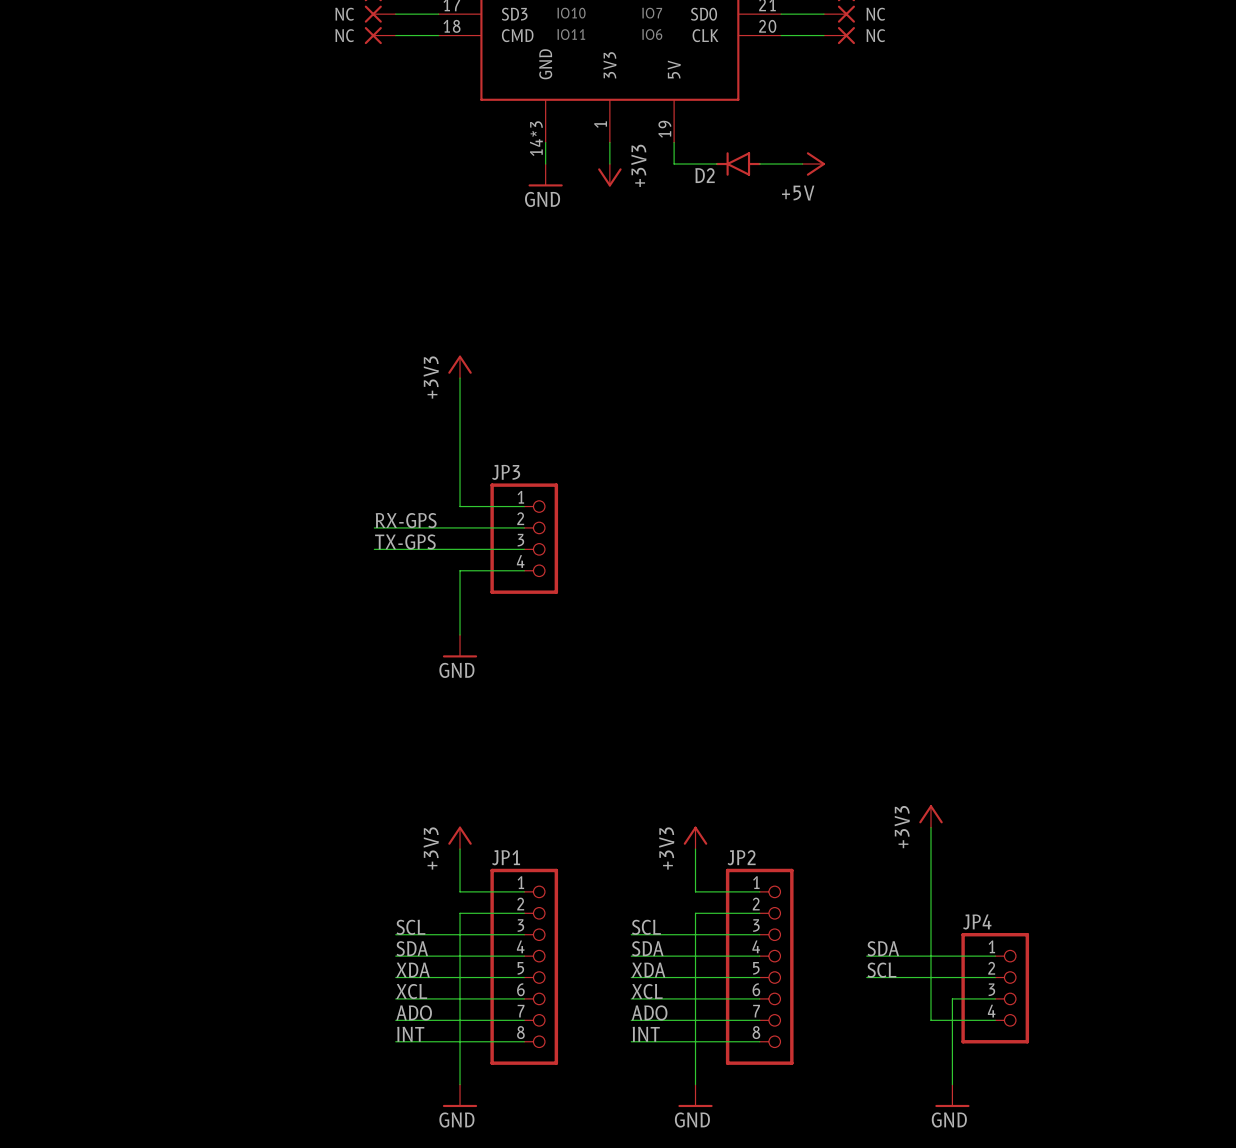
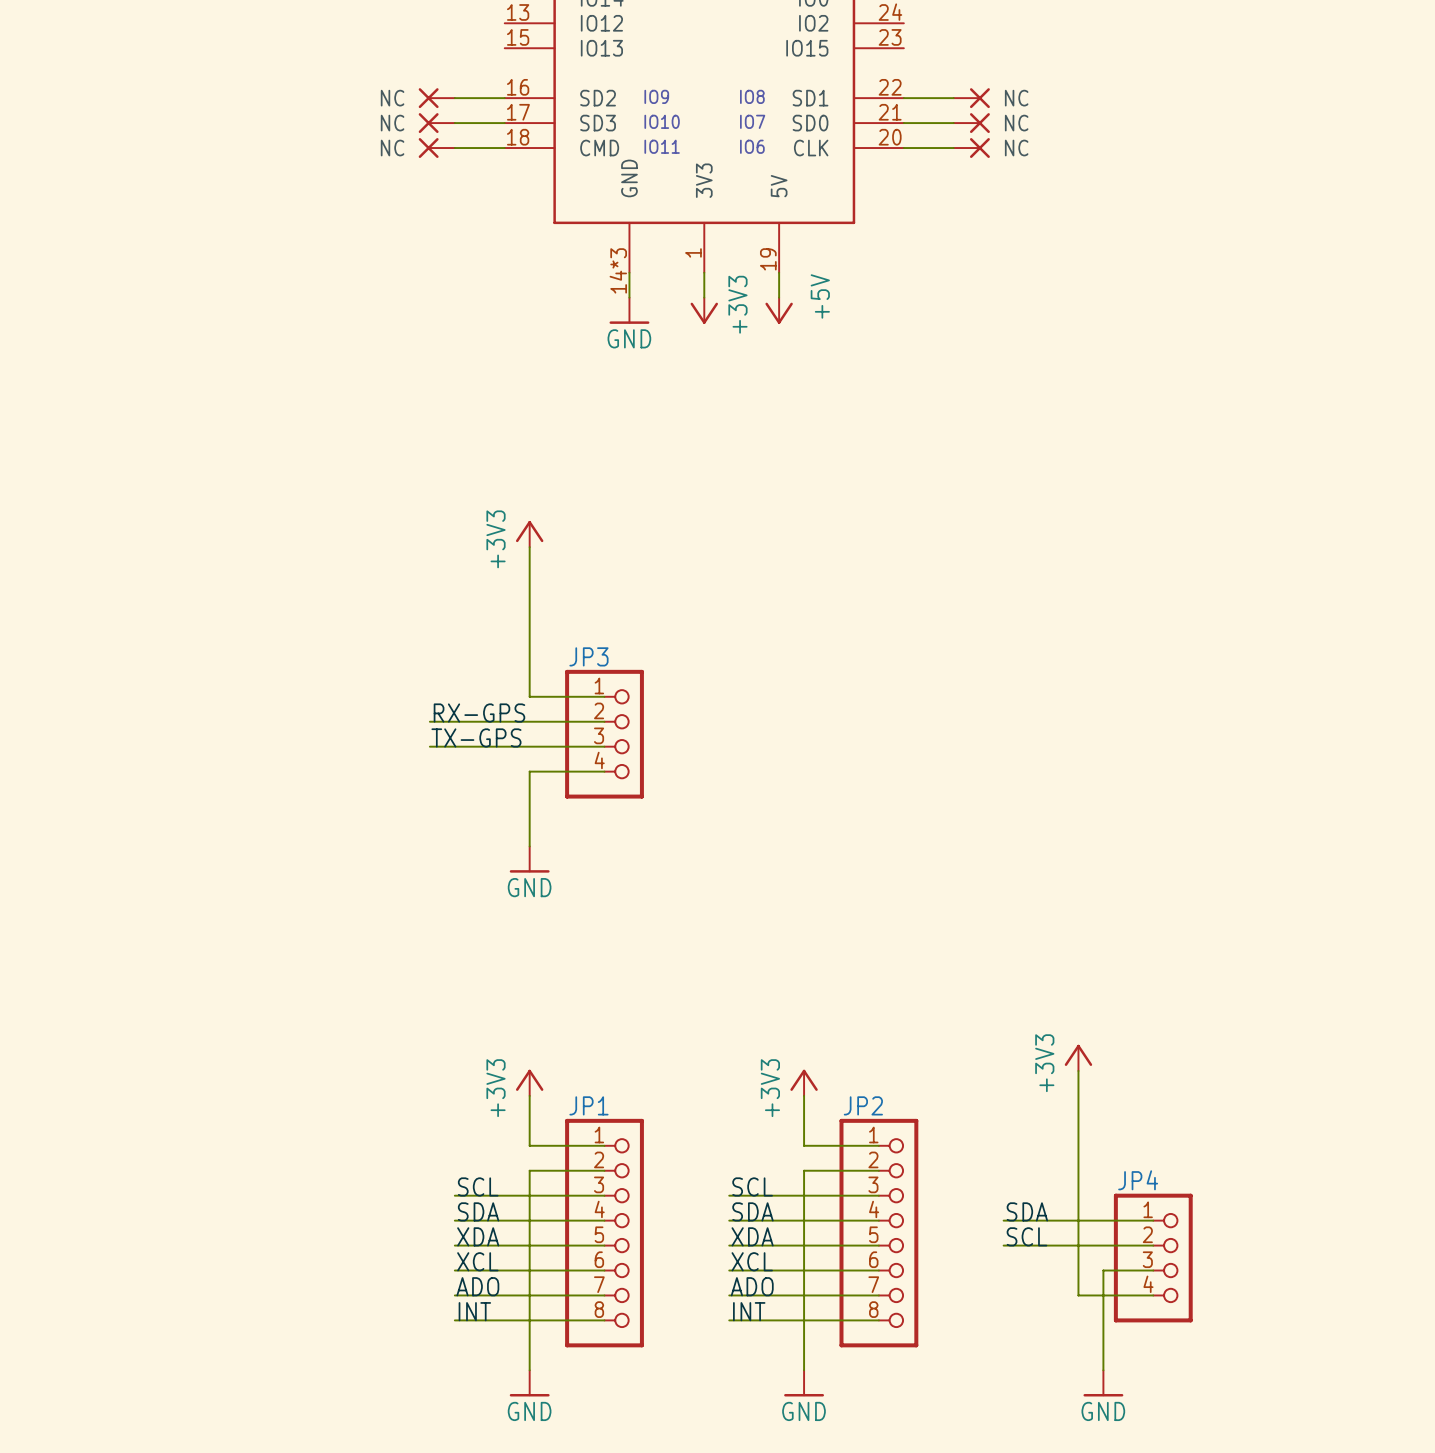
wire: (674, 164) (716, 164) -> none
D2: (738, 164) -> none
wire: (759, 164) (802, 164) -> none
power symbol position: +5V (813, 164) -> +5V (779, 310)
power symbol rotation: 0° (815, 164) -> 90° clockwise (779, 313)
power symbol text position: +5V (798, 193) -> +5V (820, 296)

